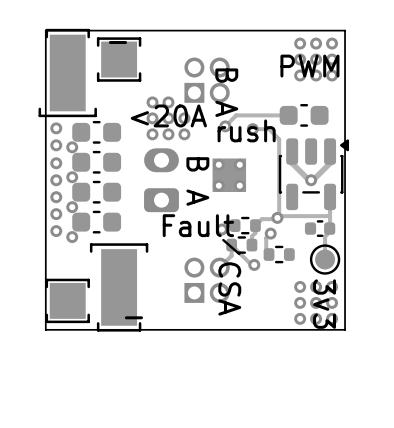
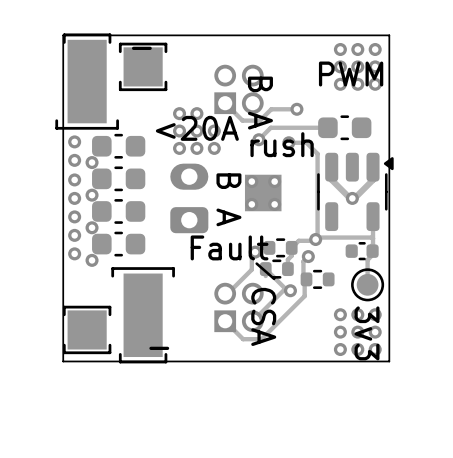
track: none -> (225, 103) (242, 120) (260, 120) (271, 109) (296, 109)
via: none -> (296, 109)
part footprint: [278, 138, 350, 211] -> [317, 152, 394, 232]
track: none -> (251, 254) (251, 269) (227, 293)
track: (231, 251) (231, 255) (219, 267) -> none
track: none -> (304, 281) (304, 296) (261, 339) (243, 339) (225, 321)
track: none -> (290, 289) (284, 289) (252, 321)

